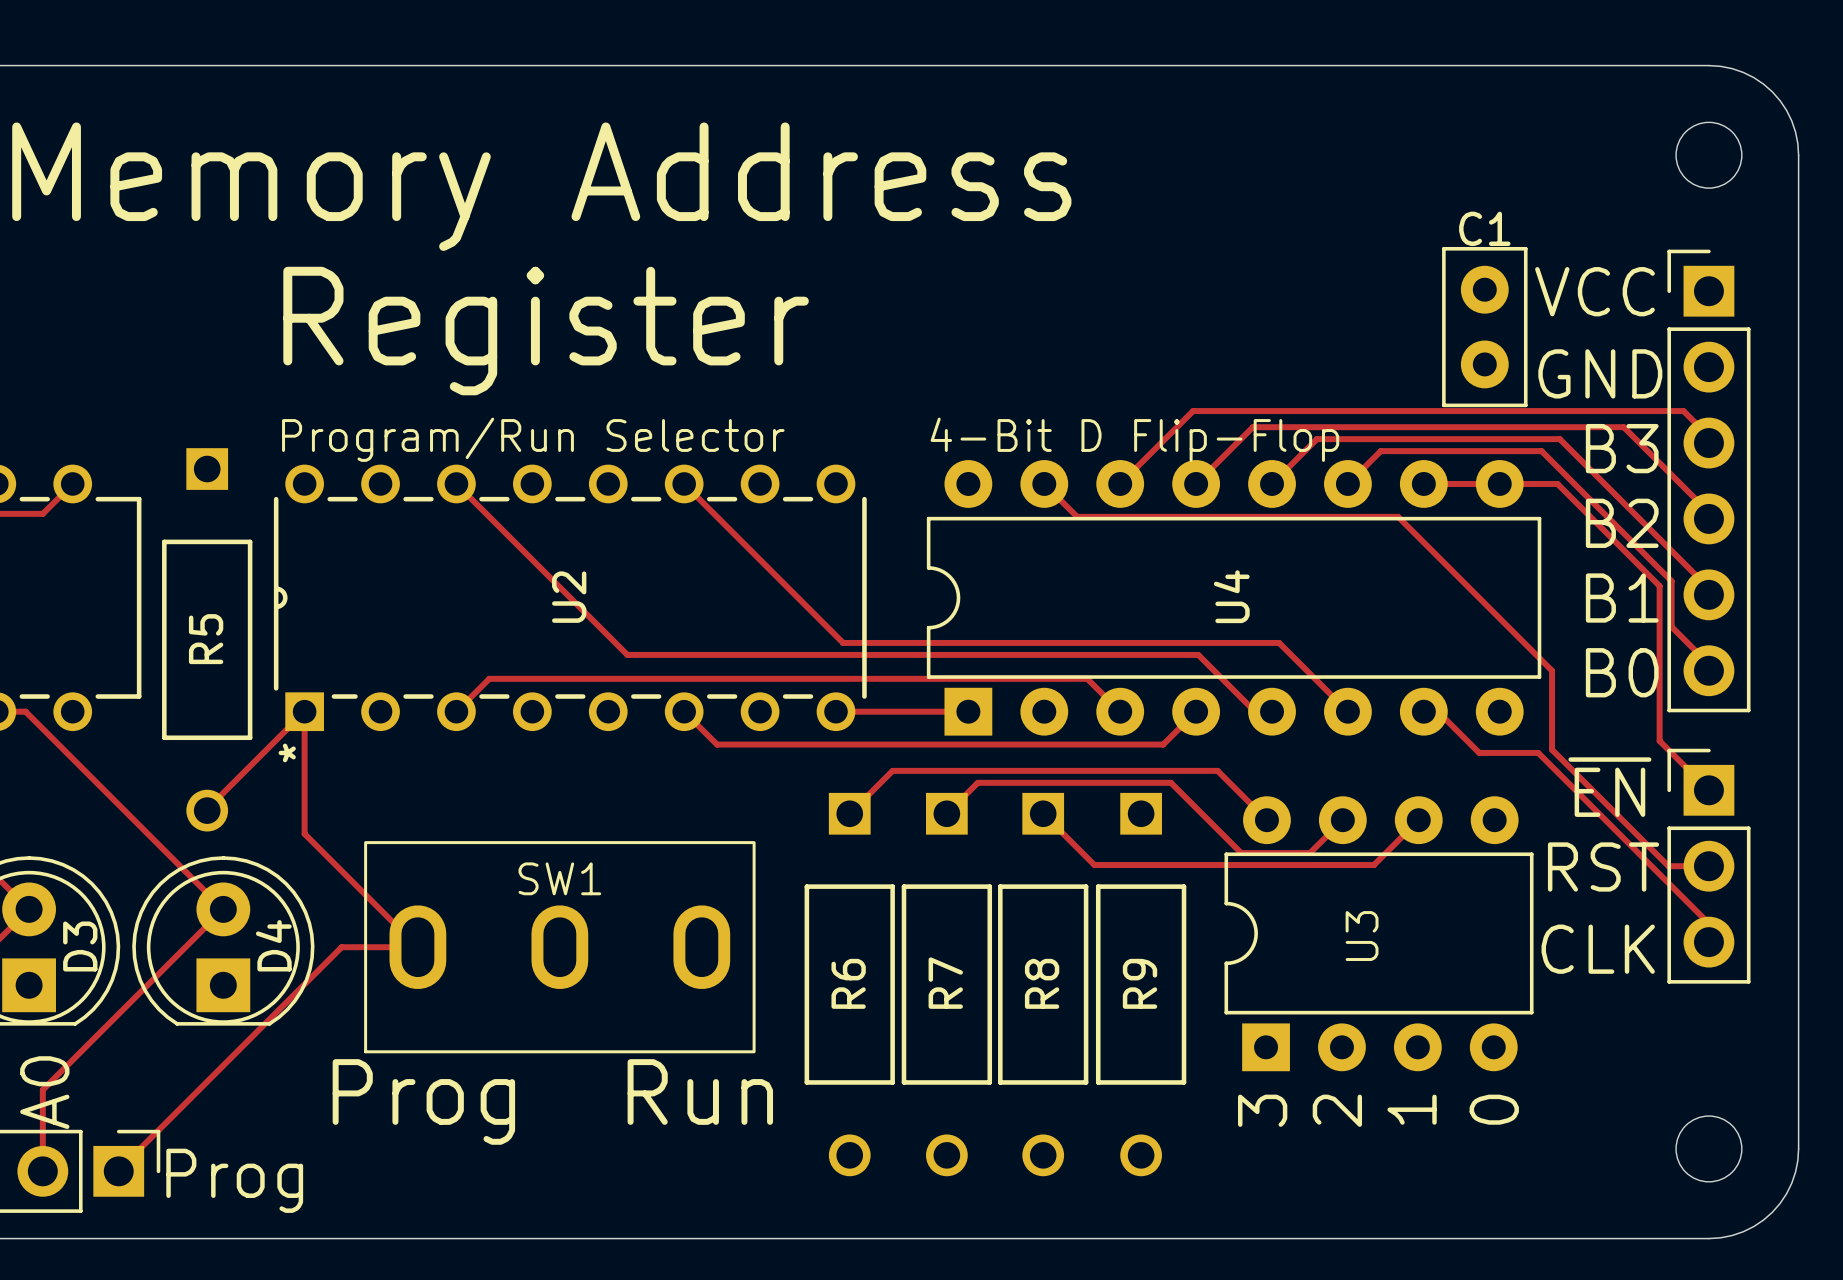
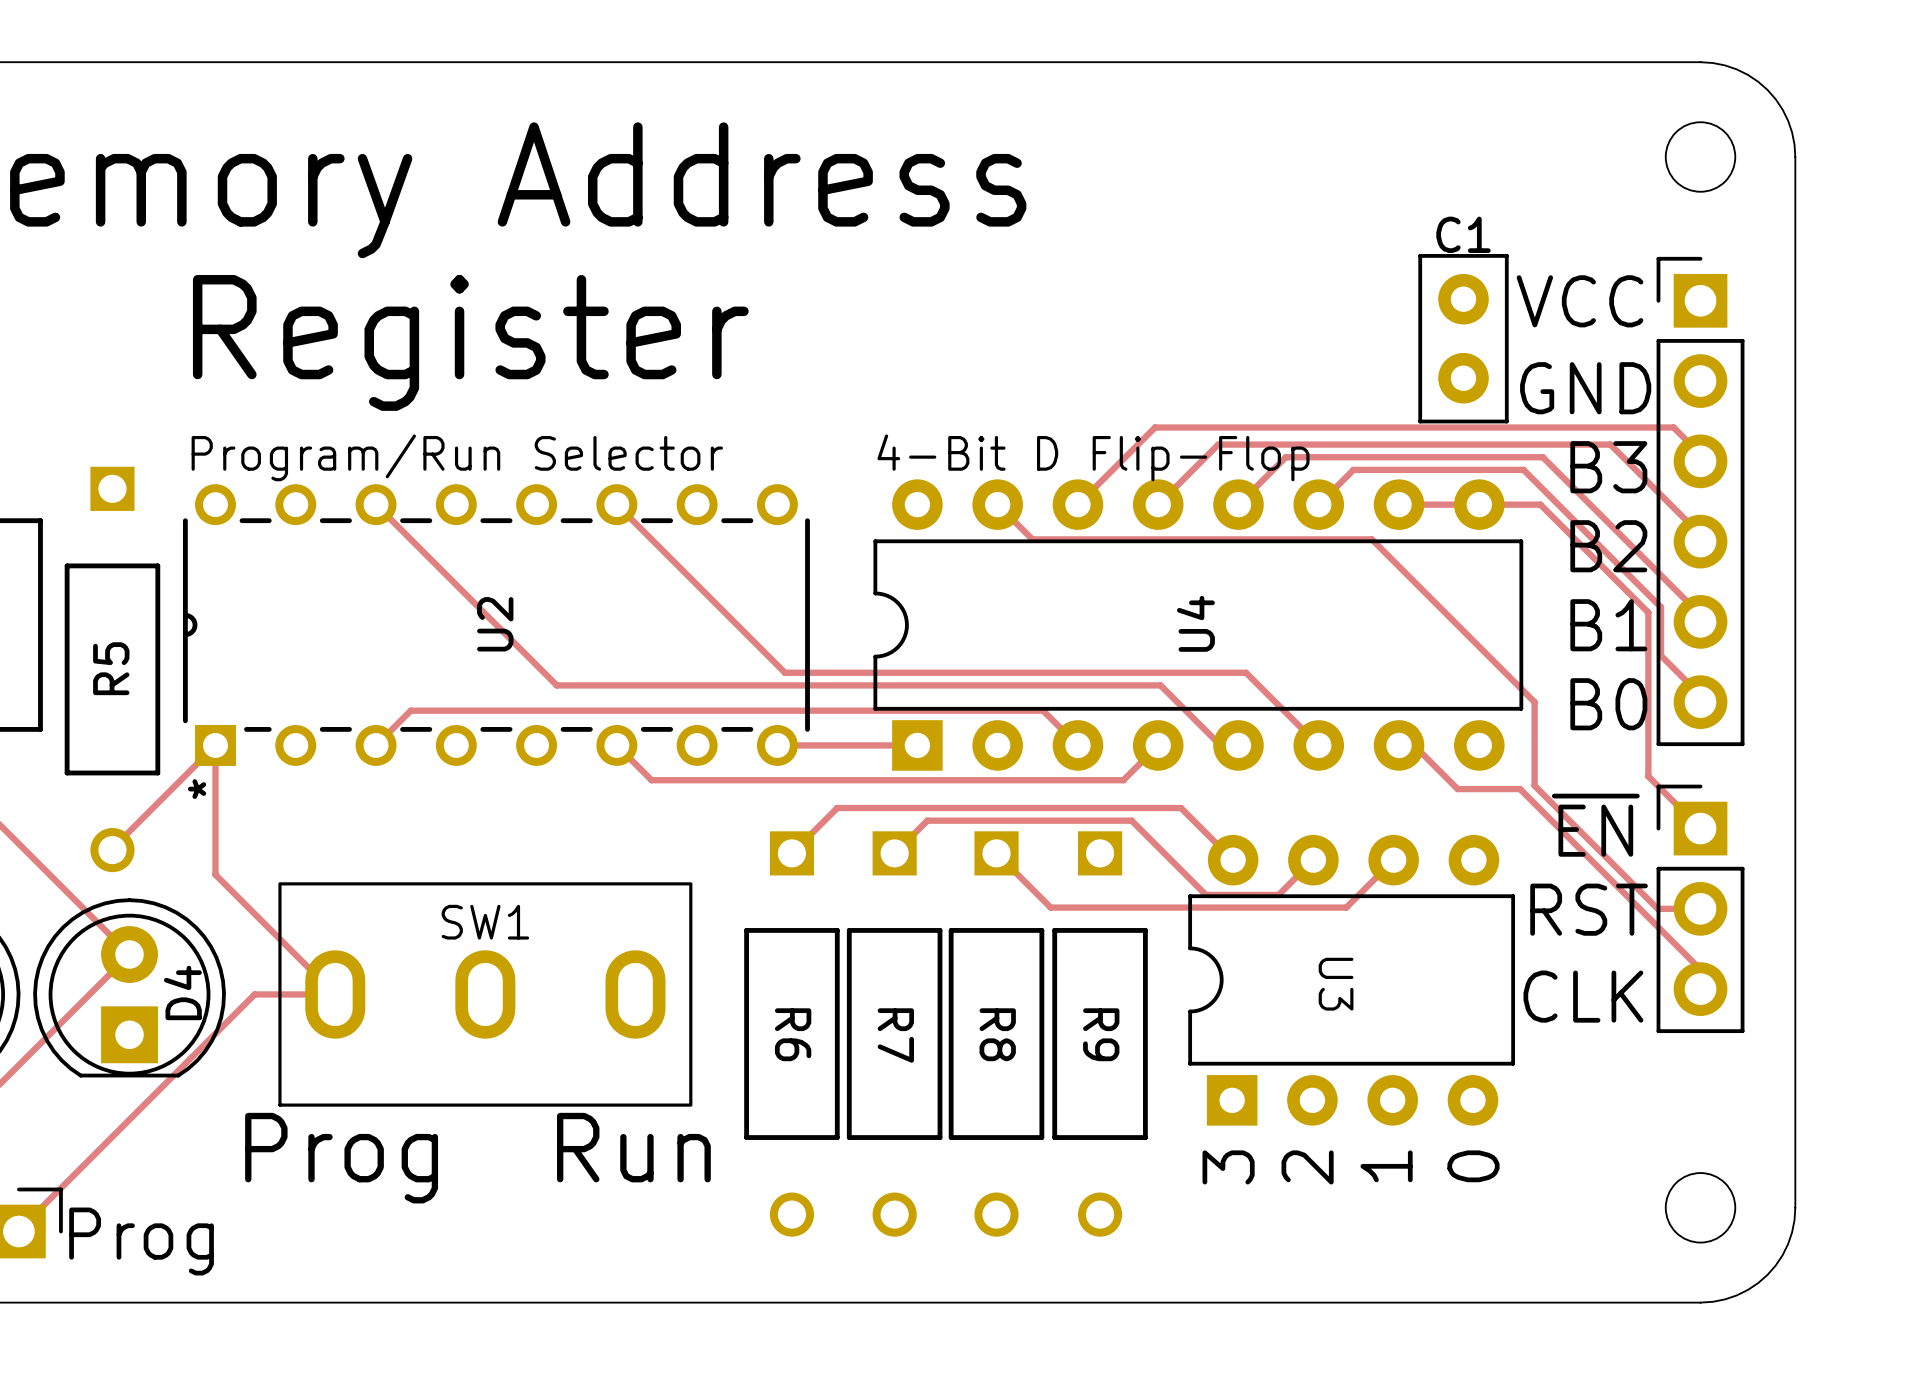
U3 name rotation: 0° (1362, 936) -> 180° (1336, 984)
R6 name rotation: 0° (848, 983) -> 180° (793, 1034)
R7 name rotation: 0° (945, 983) -> 180° (895, 1035)
R8 name rotation: 0° (1042, 983) -> 180° (997, 1034)
R9 name rotation: 0° (1140, 983) -> 180° (1101, 1034)

